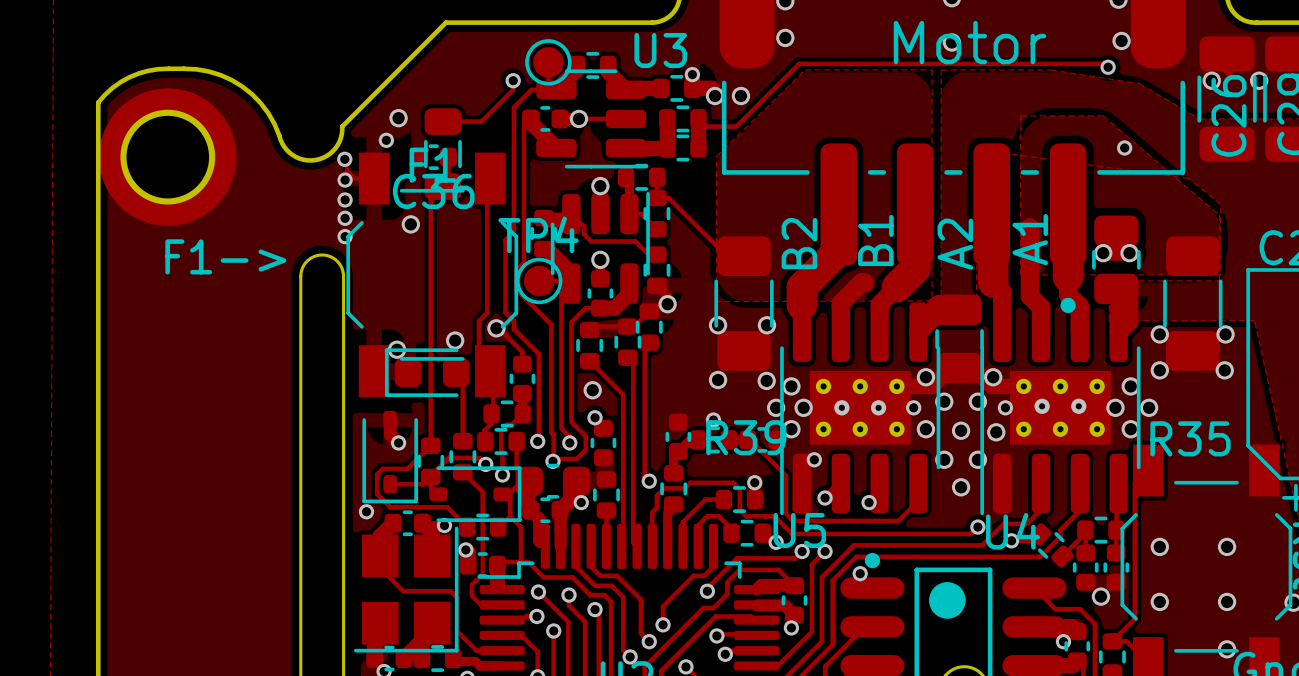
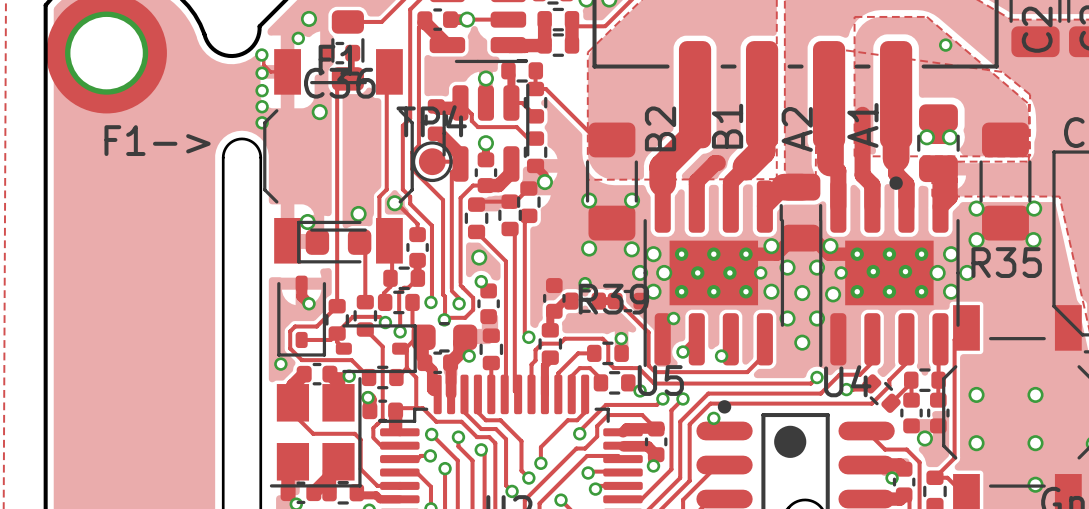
R35 name position: R35 (1190, 438) -> R35 (1006, 262)

